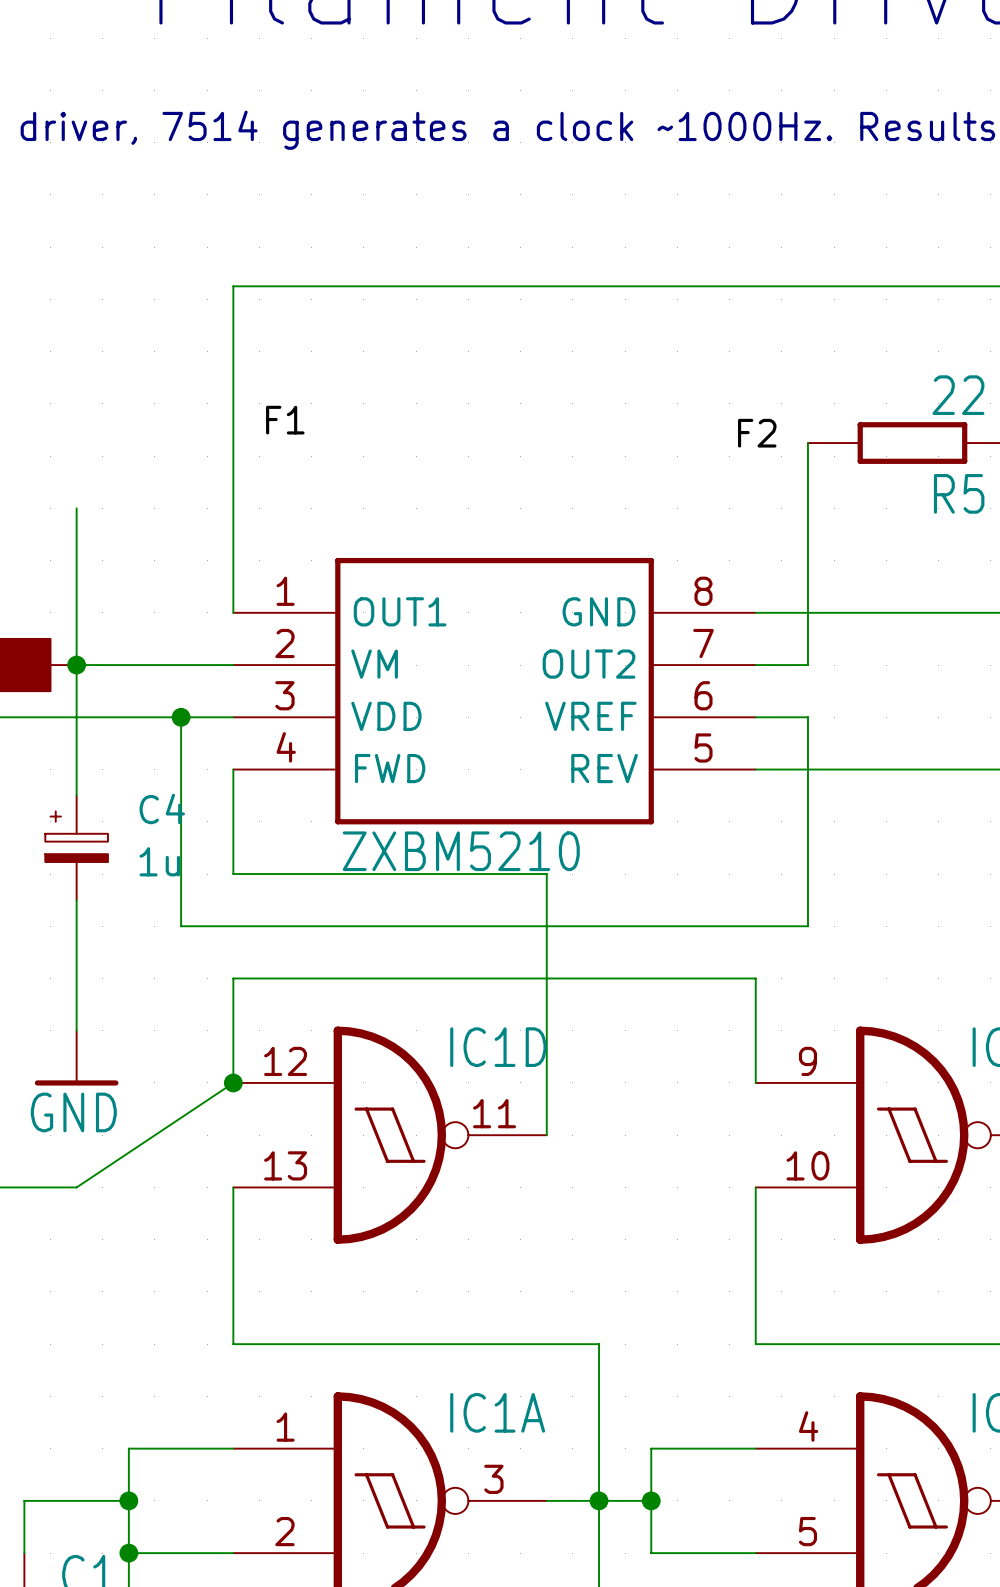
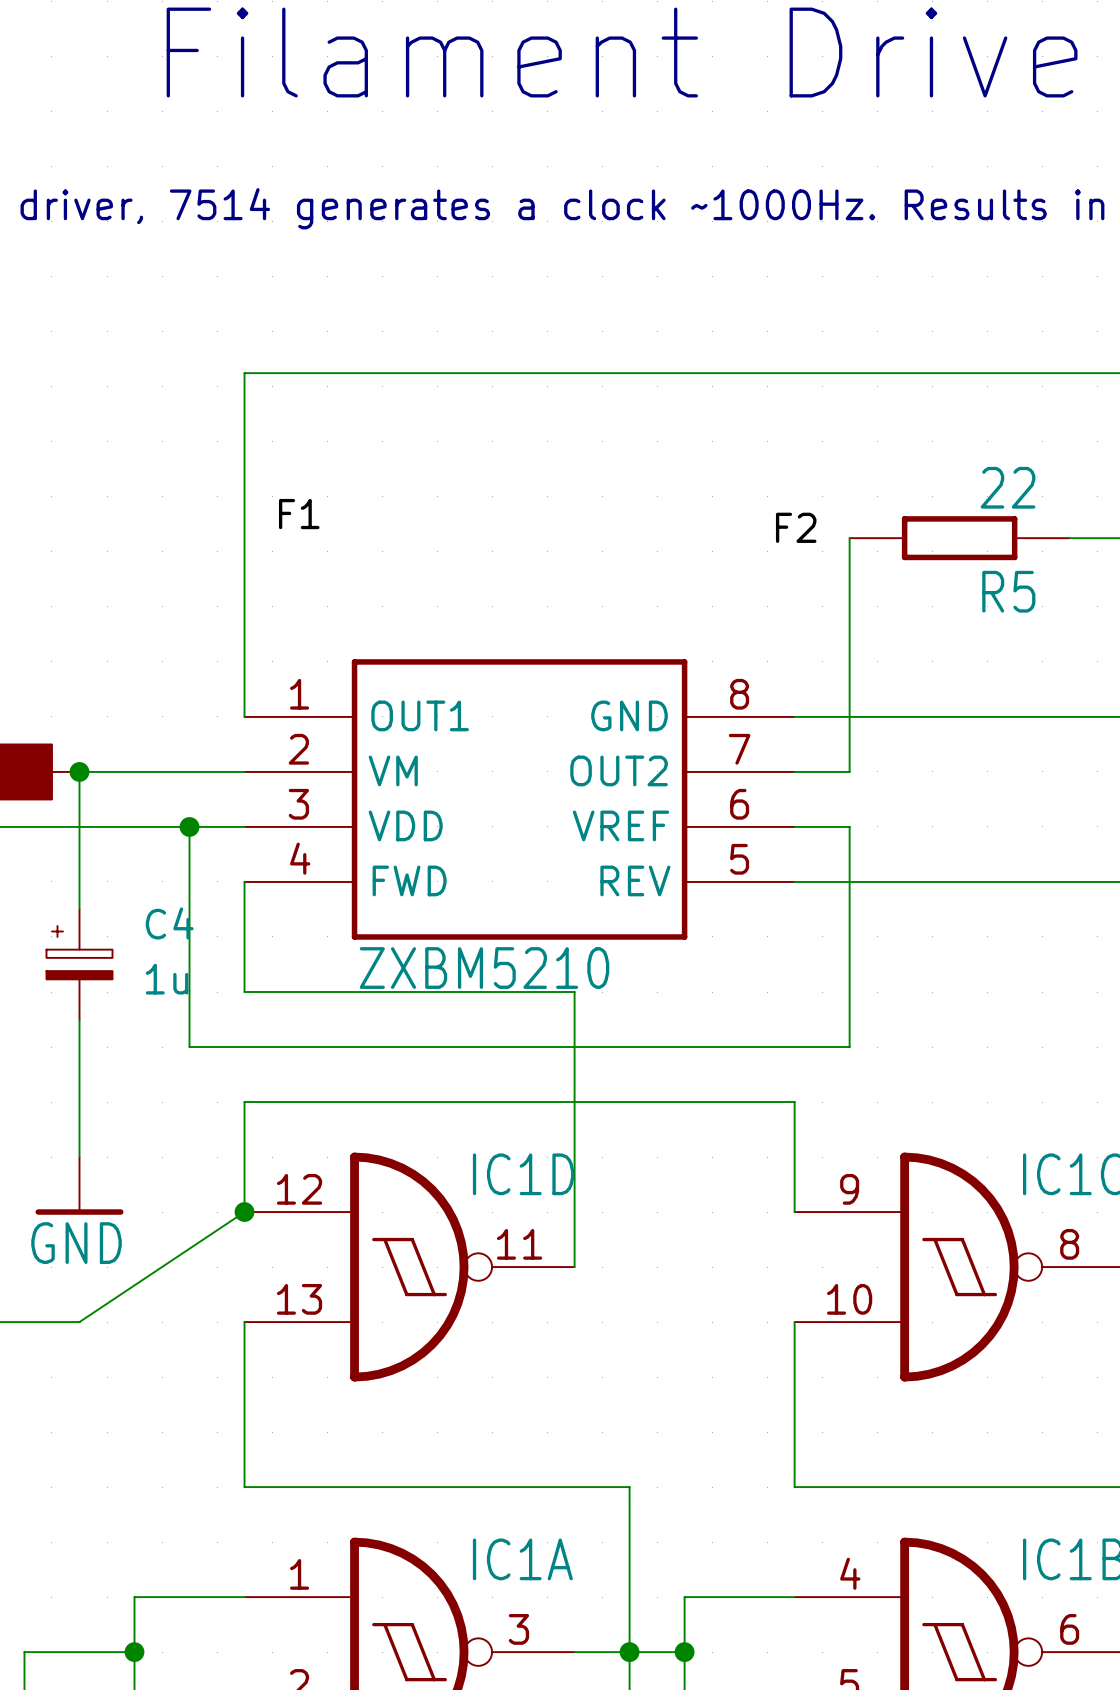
wire: (76, 508) (76, 665) -> none

